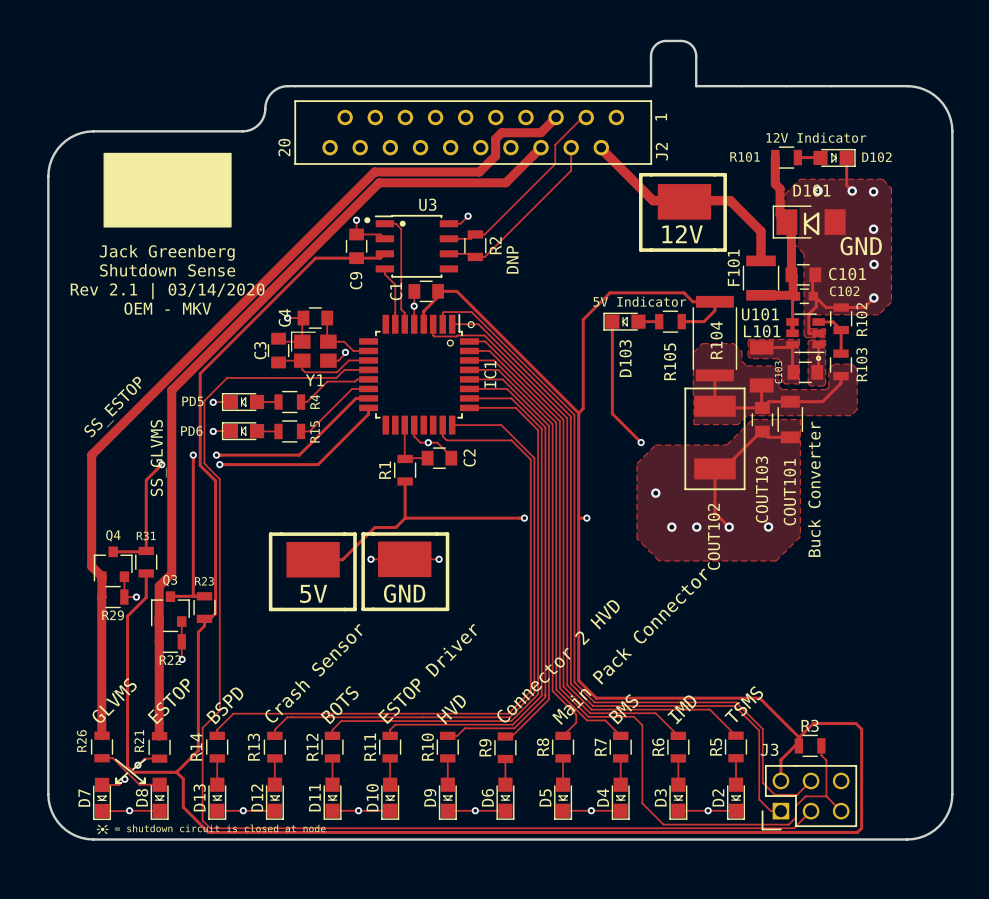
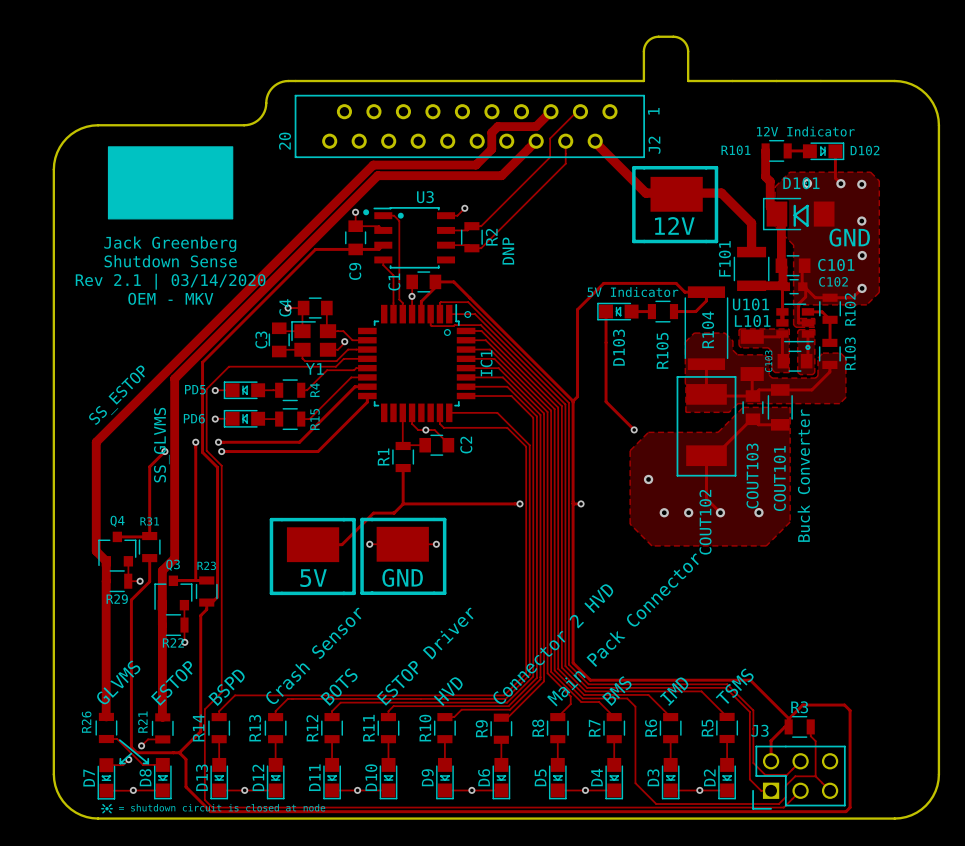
line: (145, 759) (132, 769) -> none

